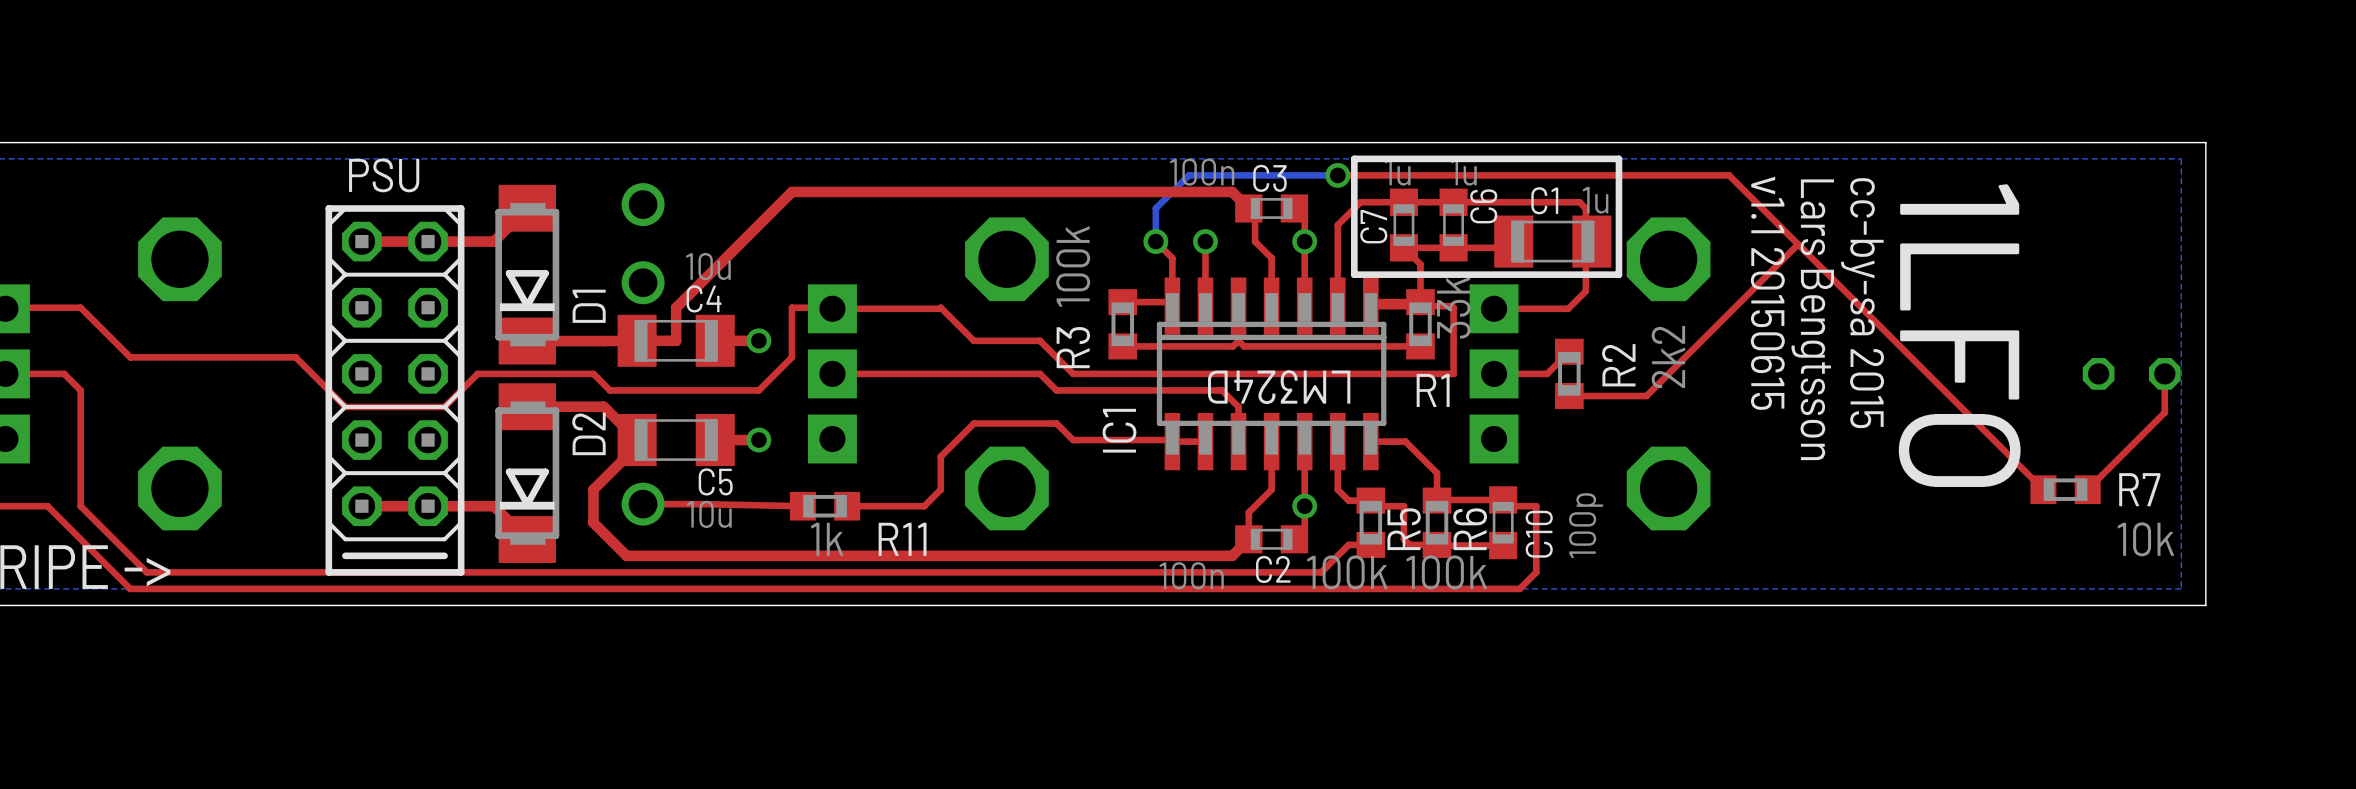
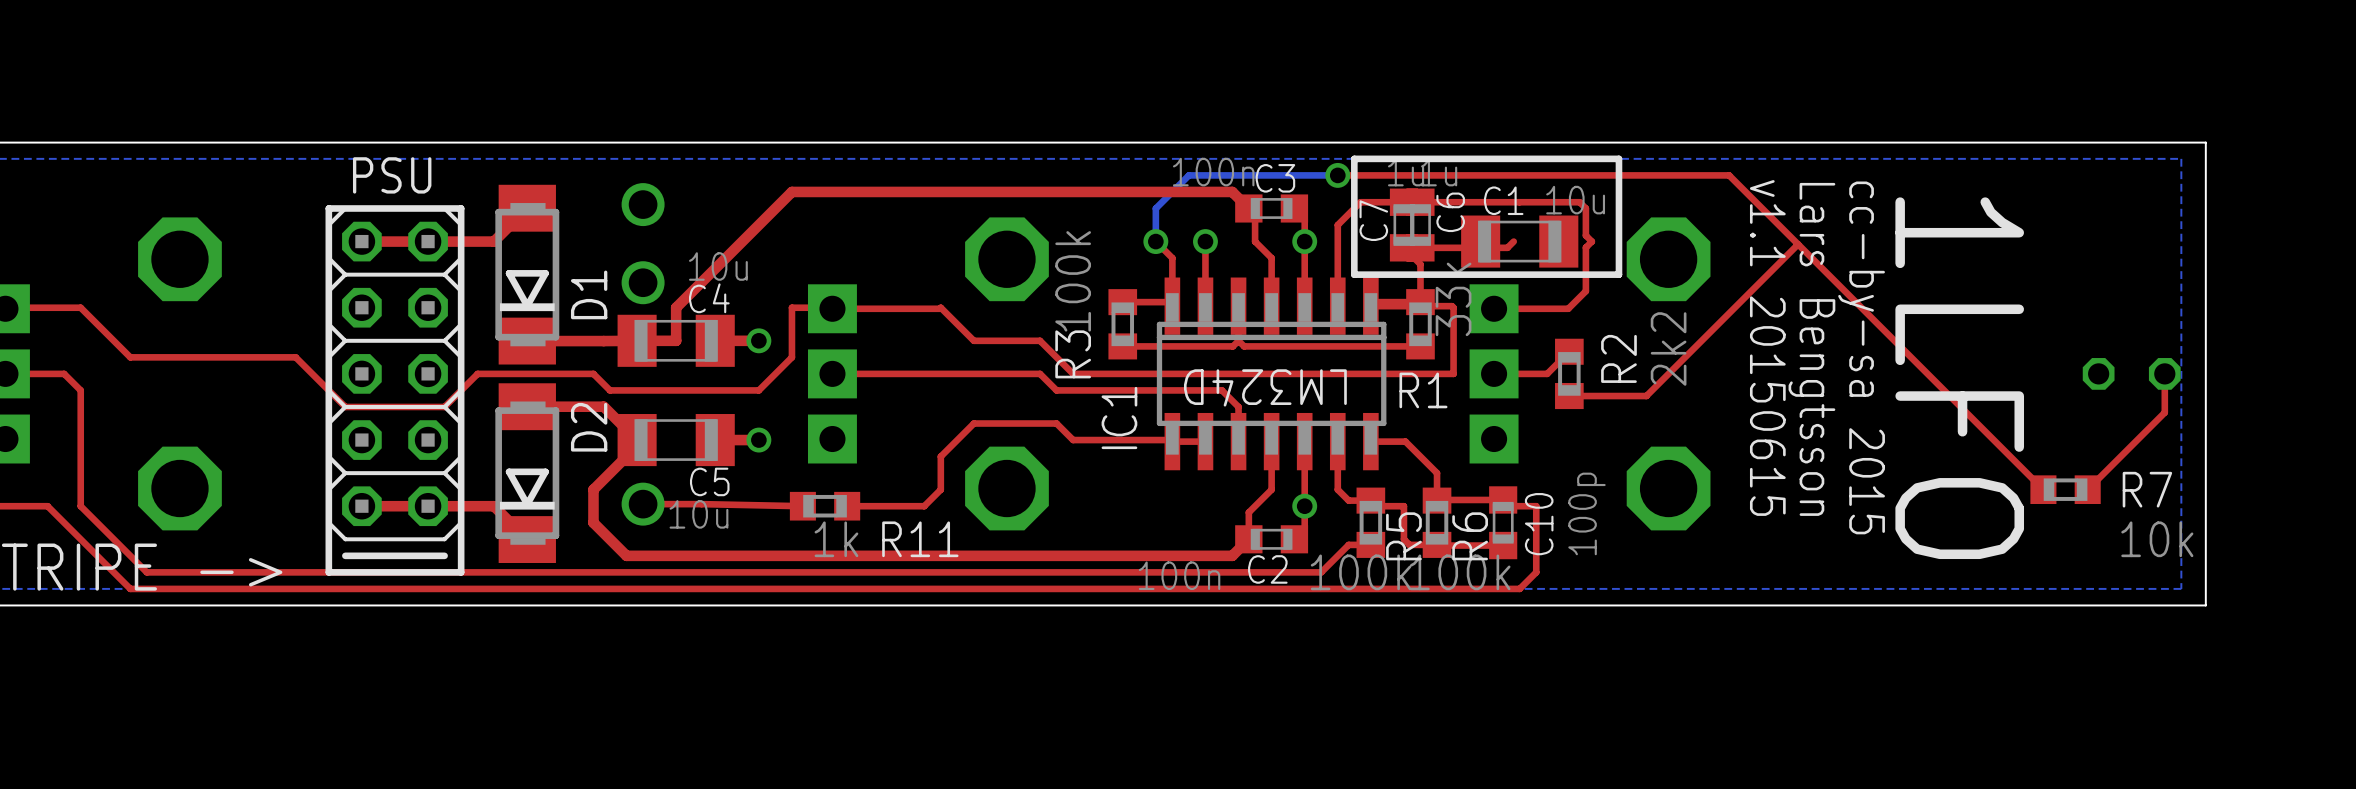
C1 value: 1u (1595, 200) -> 10u (1575, 200)
C6 position: (1453, 225) -> (1420, 225)
C1 position: (1552, 241) -> (1519, 241)

